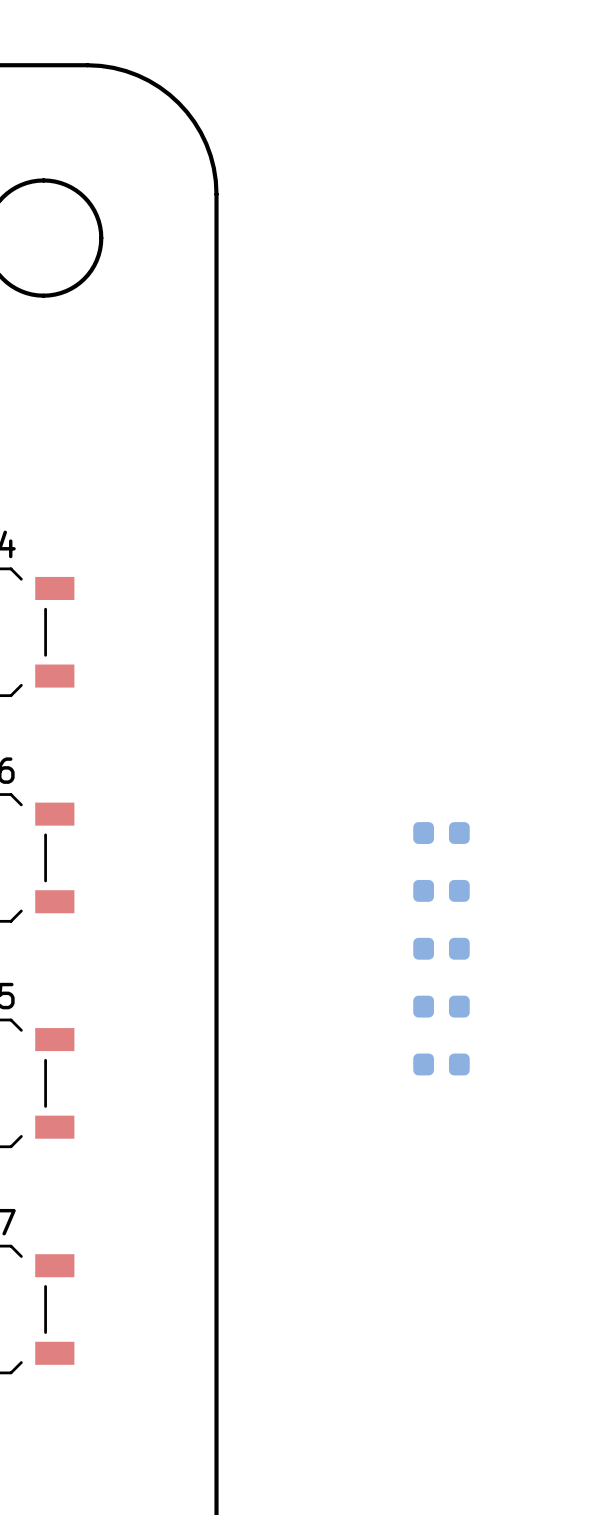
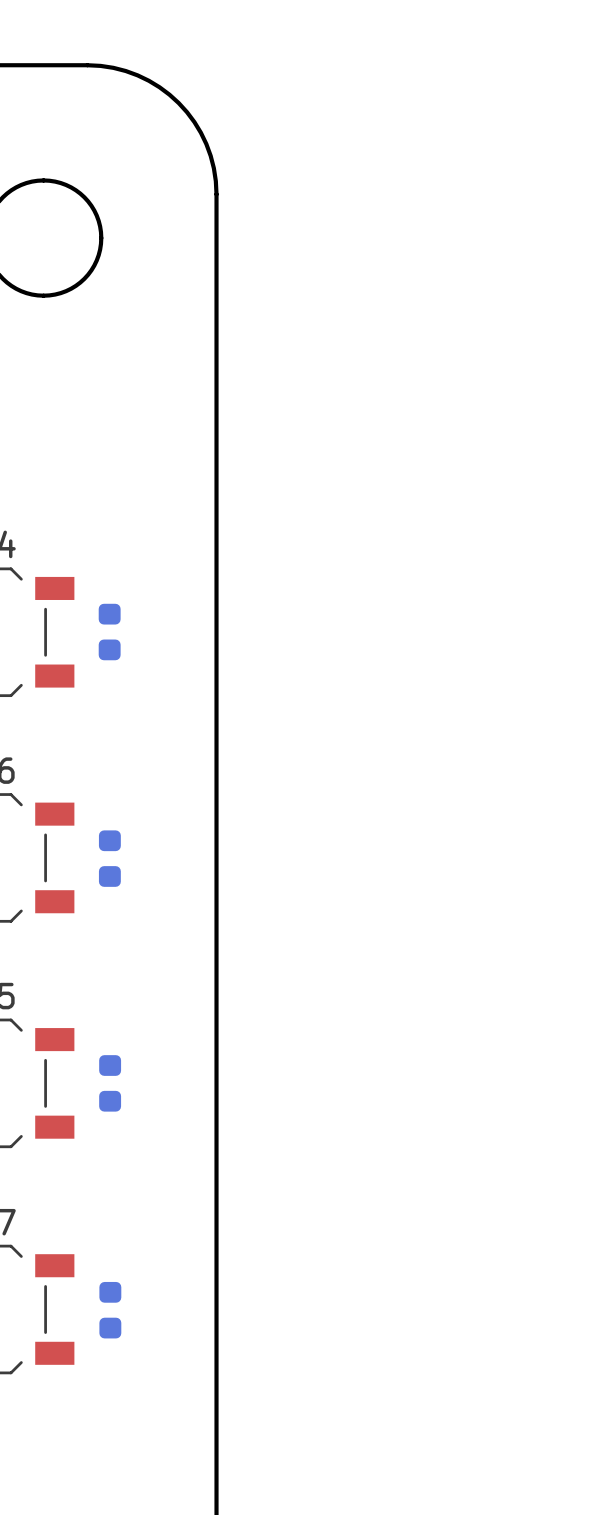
part: none -> (109, 632)
part: (441, 833) -> none
part: none -> (109, 858)
part: (441, 890) -> none
part: (441, 948) -> none
part: (441, 1006) -> none
part: (441, 1064) -> none
part: none -> (110, 1083)
part: none -> (110, 1310)

